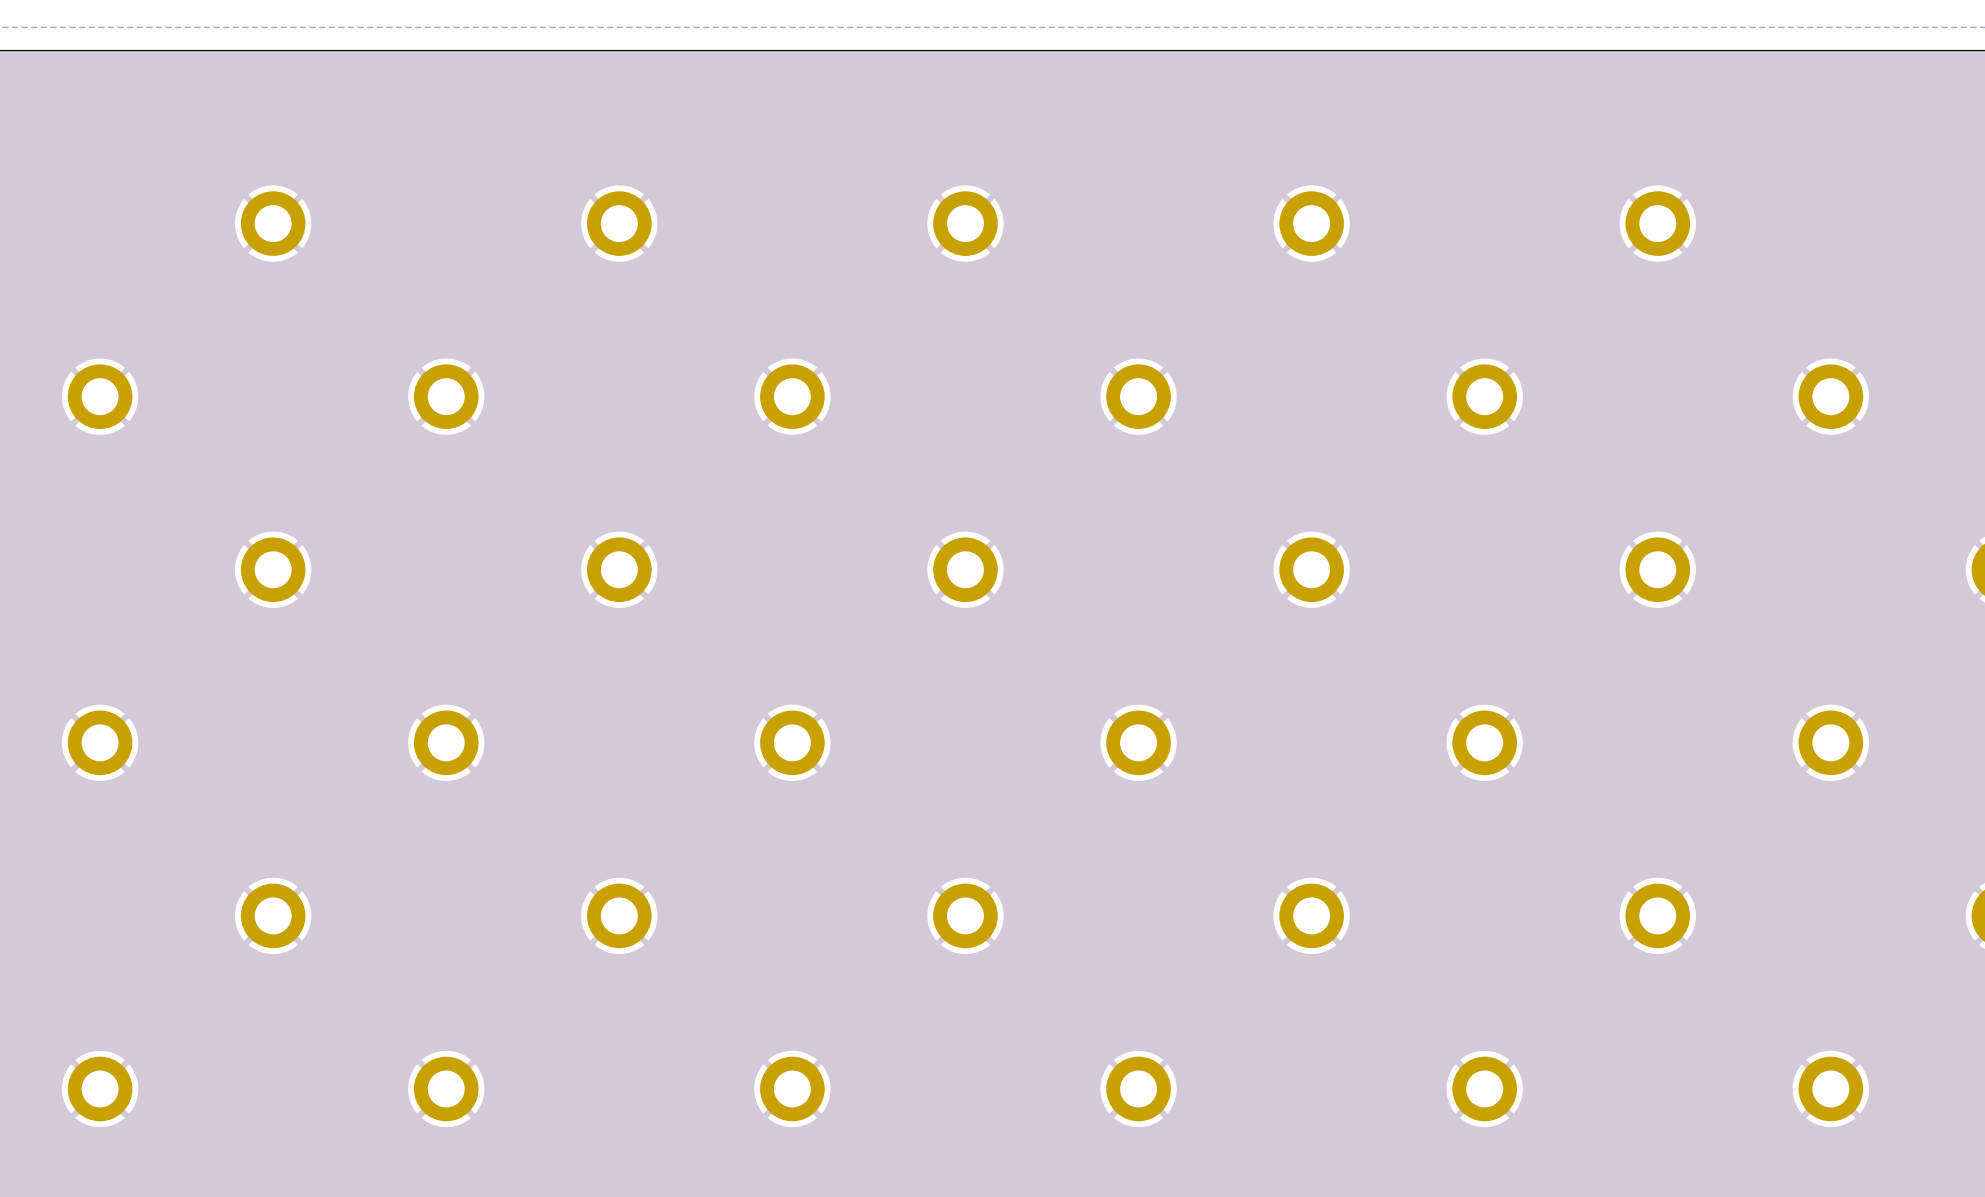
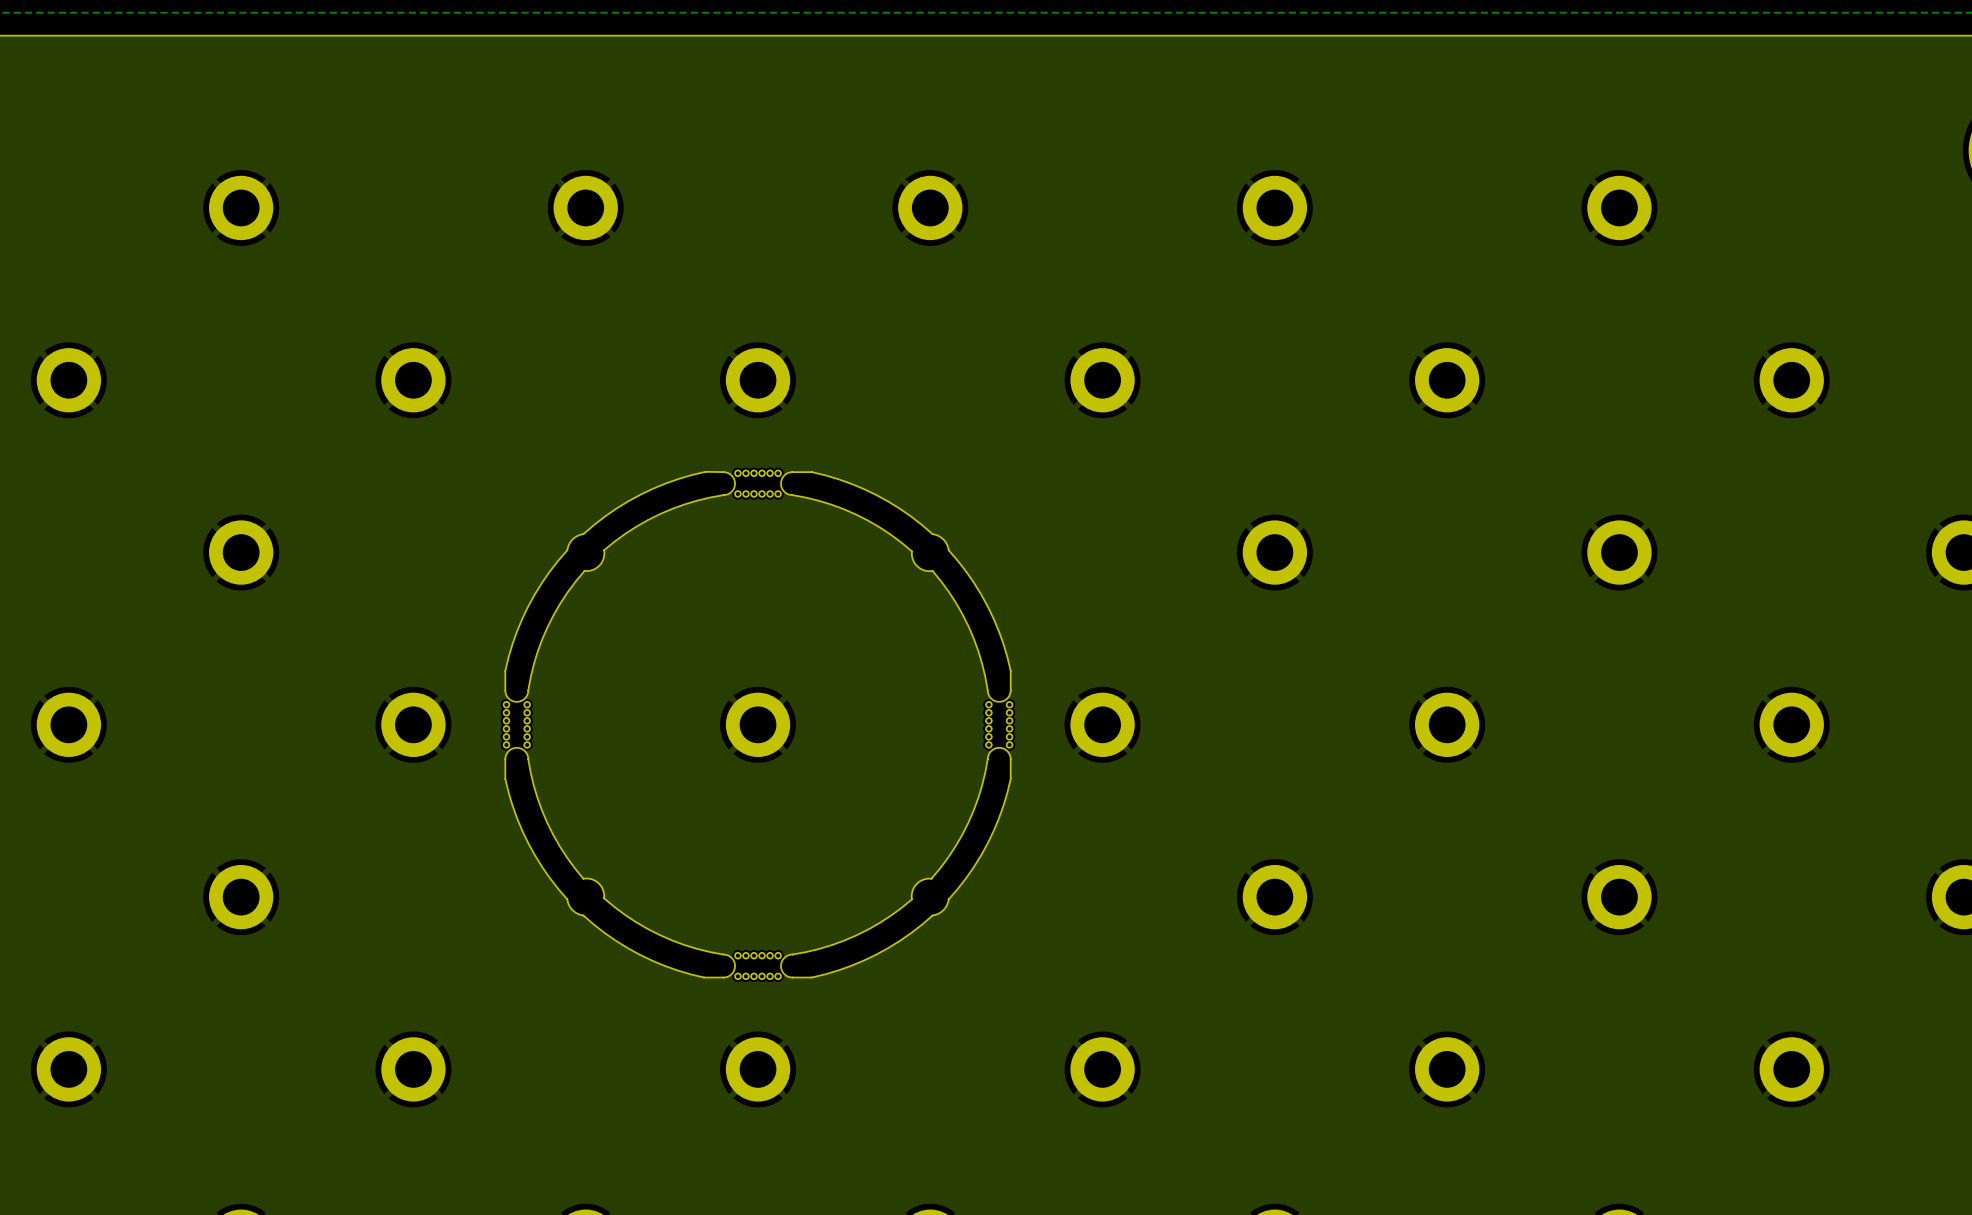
board edge: none -> (723, 472) (705, 471) (692, 474) (652, 488) (616, 508) (583, 534) (572, 539) (567, 550) (542, 582) (522, 618) (505, 670) (505, 690)
board edge: none -> (792, 472) (811, 472) (864, 489) (900, 508) (932, 534) (943, 539) (948, 550) (973, 582) (993, 618) (1010, 670) (1010, 690)
part: none -> (758, 483)
board edge: none -> (723, 495) (697, 500) (659, 514) (636, 526) (604, 550) (600, 563) (592, 569) (584, 570) (567, 591) (553, 614) (537, 651) (528, 690)
board edge: none -> (792, 495) (831, 504) (868, 520) (890, 534) (911, 551) (913, 561) (918, 567) (932, 570) (948, 591) (968, 626) (982, 664) (987, 690)
part: (619, 569) -> none
part: (965, 569) -> none
part: none -> (516, 724)
part: none -> (999, 724)
board edge: none -> (505, 759) (505, 778) (522, 830) (542, 866) (567, 899) (572, 910) (583, 915) (615, 940) (651, 960) (704, 977) (723, 977)
board edge: none -> (528, 759) (537, 798) (547, 822) (559, 846) (583, 878) (597, 881) (602, 888) (604, 898) (625, 914) (647, 928) (684, 945) (723, 954)
board edge: none -> (987, 759) (978, 798) (962, 835) (948, 857) (931, 878) (921, 880) (915, 885) (911, 899) (890, 915) (856, 935) (831, 945) (792, 954)
board edge: none -> (1010, 759) (1010, 778) (993, 830) (973, 866) (948, 899) (943, 910) (932, 915) (900, 940) (864, 960) (811, 977) (792, 977)
part: (619, 915) -> none
part: (965, 915) -> none
part: none -> (758, 966)

